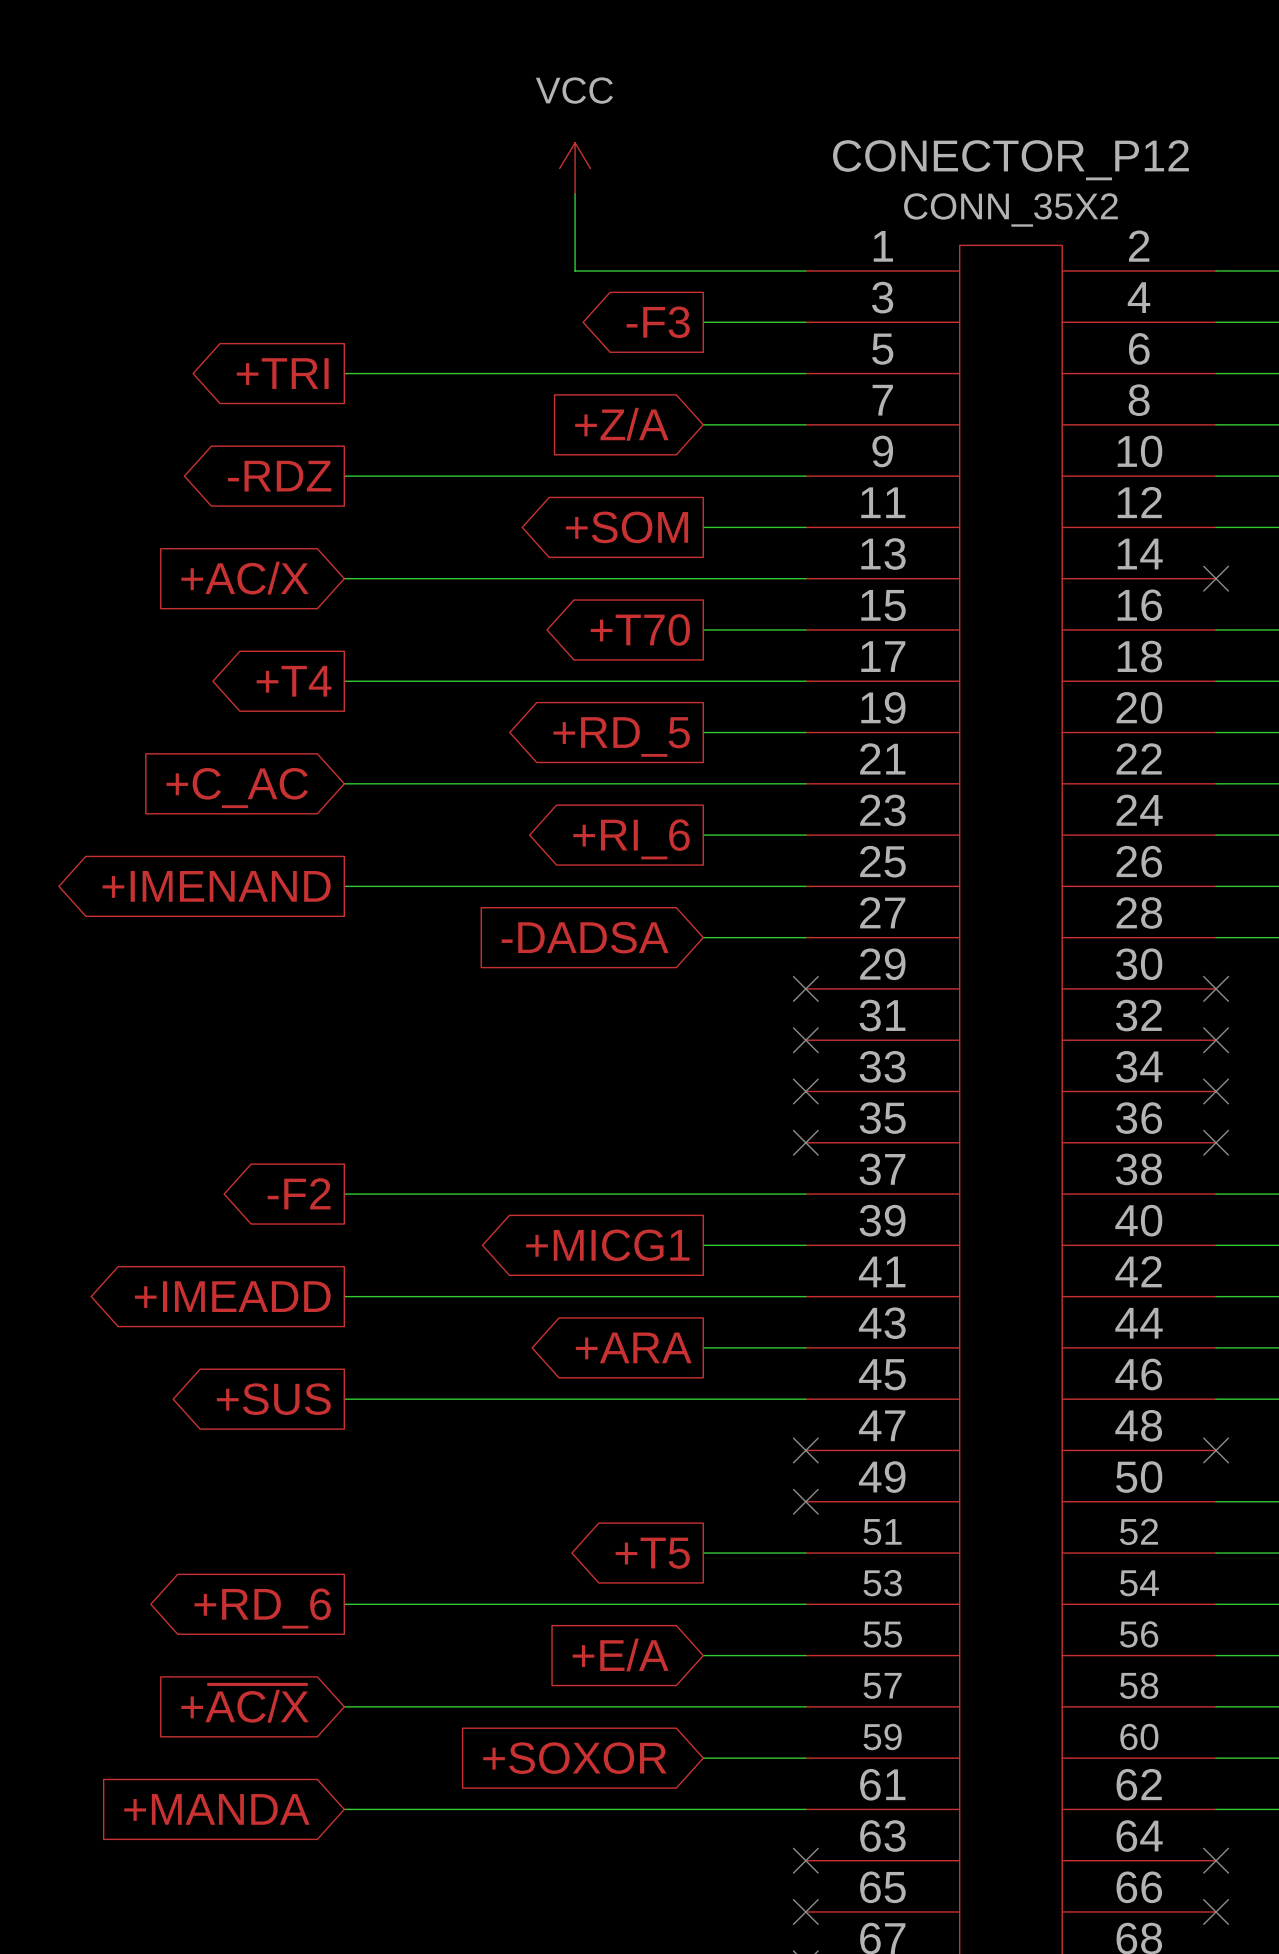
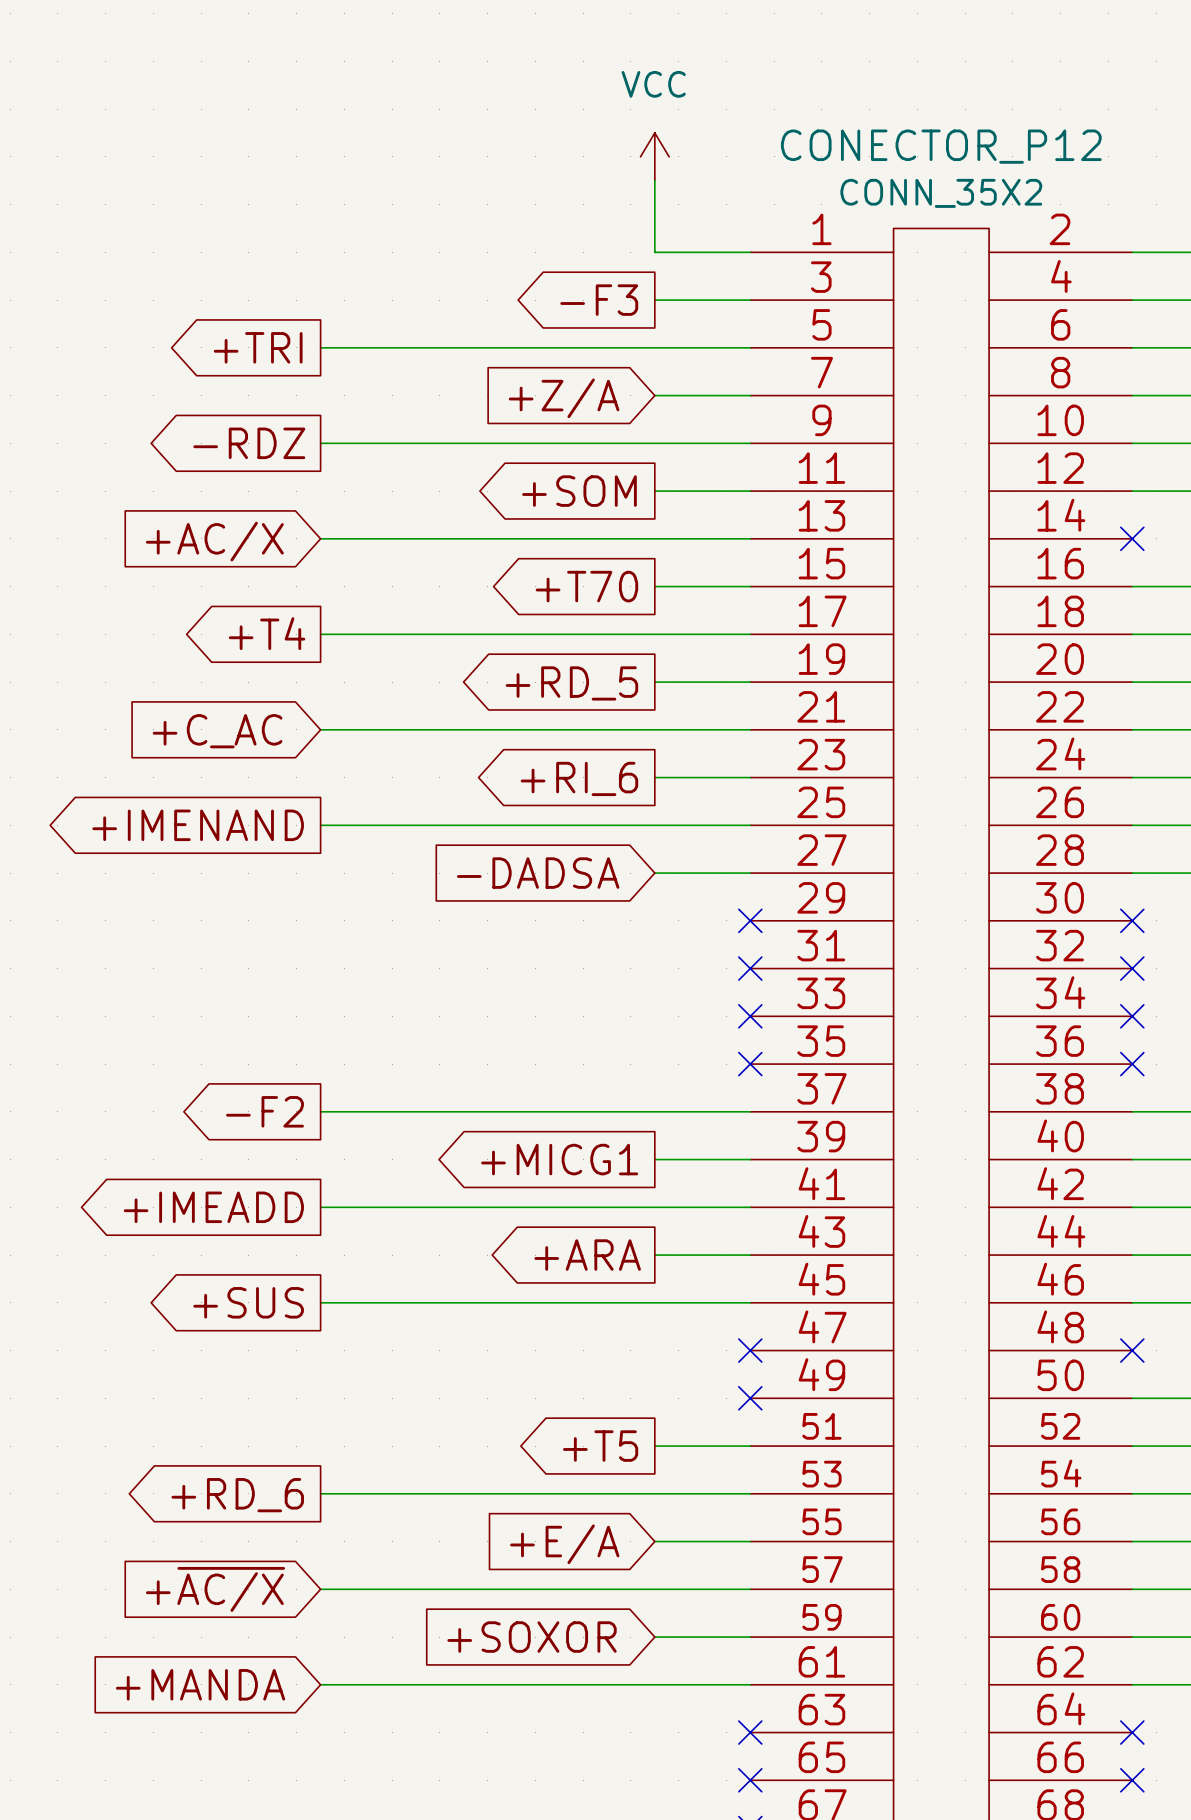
power symbol position: VCC (575, 168) -> VCC (654, 156)
wire: (575, 194) (575, 271) (703, 271) -> (654, 180) (654, 252)

